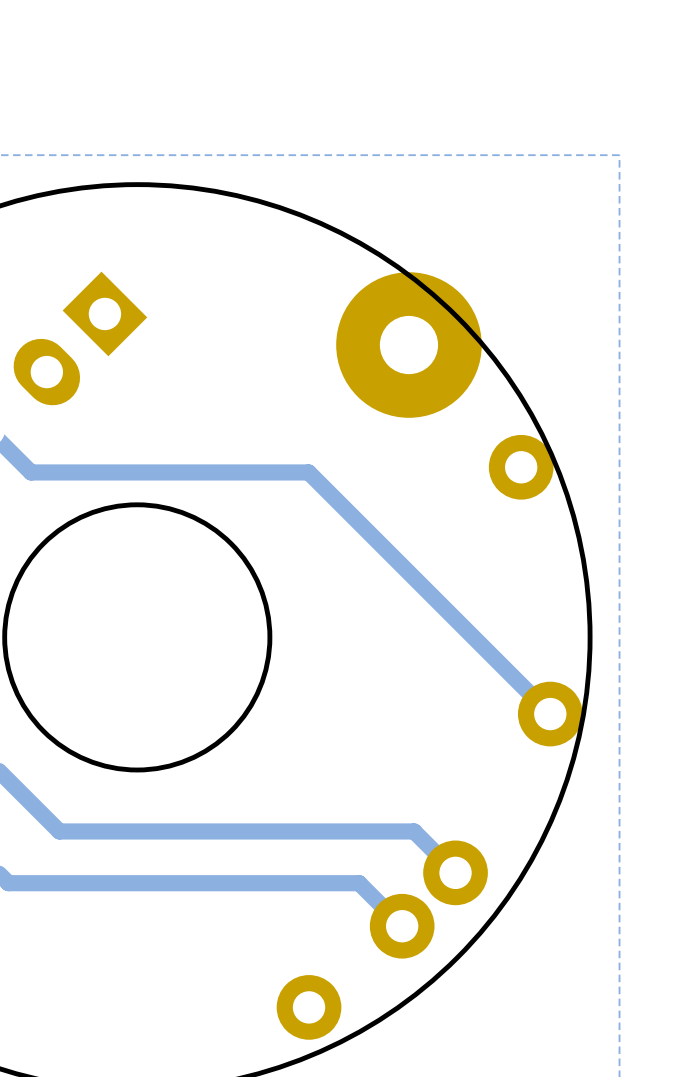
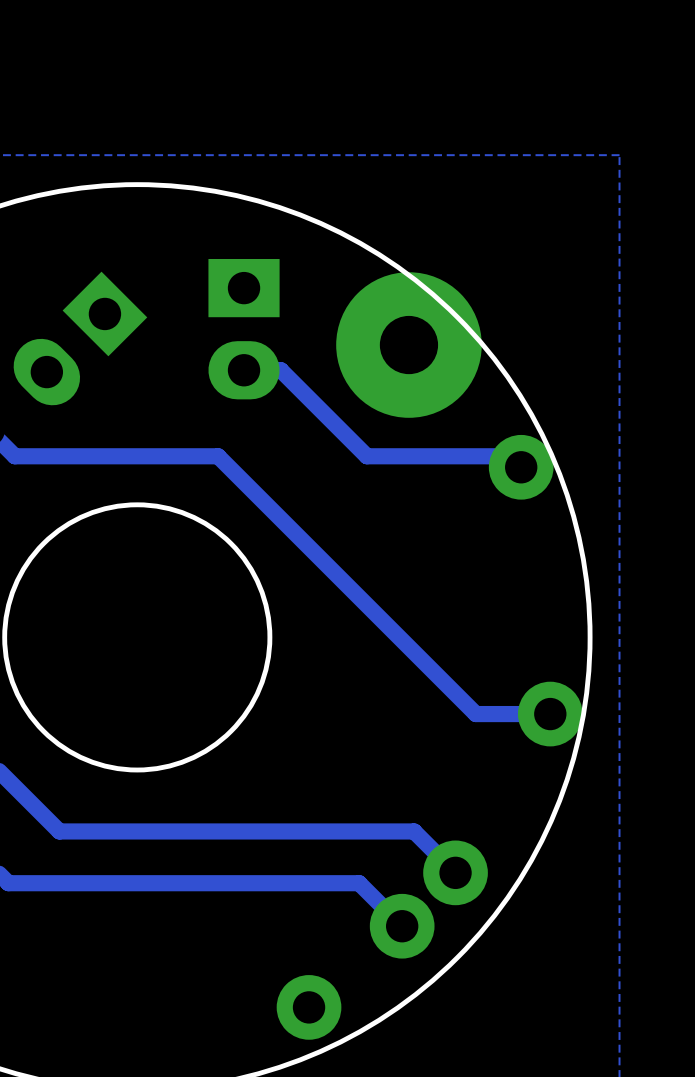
part: none -> (244, 329)
bottom track: none -> (244, 370) (280, 370) (366, 456) (510, 456) (521, 467)
bottom track: (14, 456) (31, 472) (308, 472) (550, 714) -> (14, 456) (218, 456) (475, 714) (550, 714)

